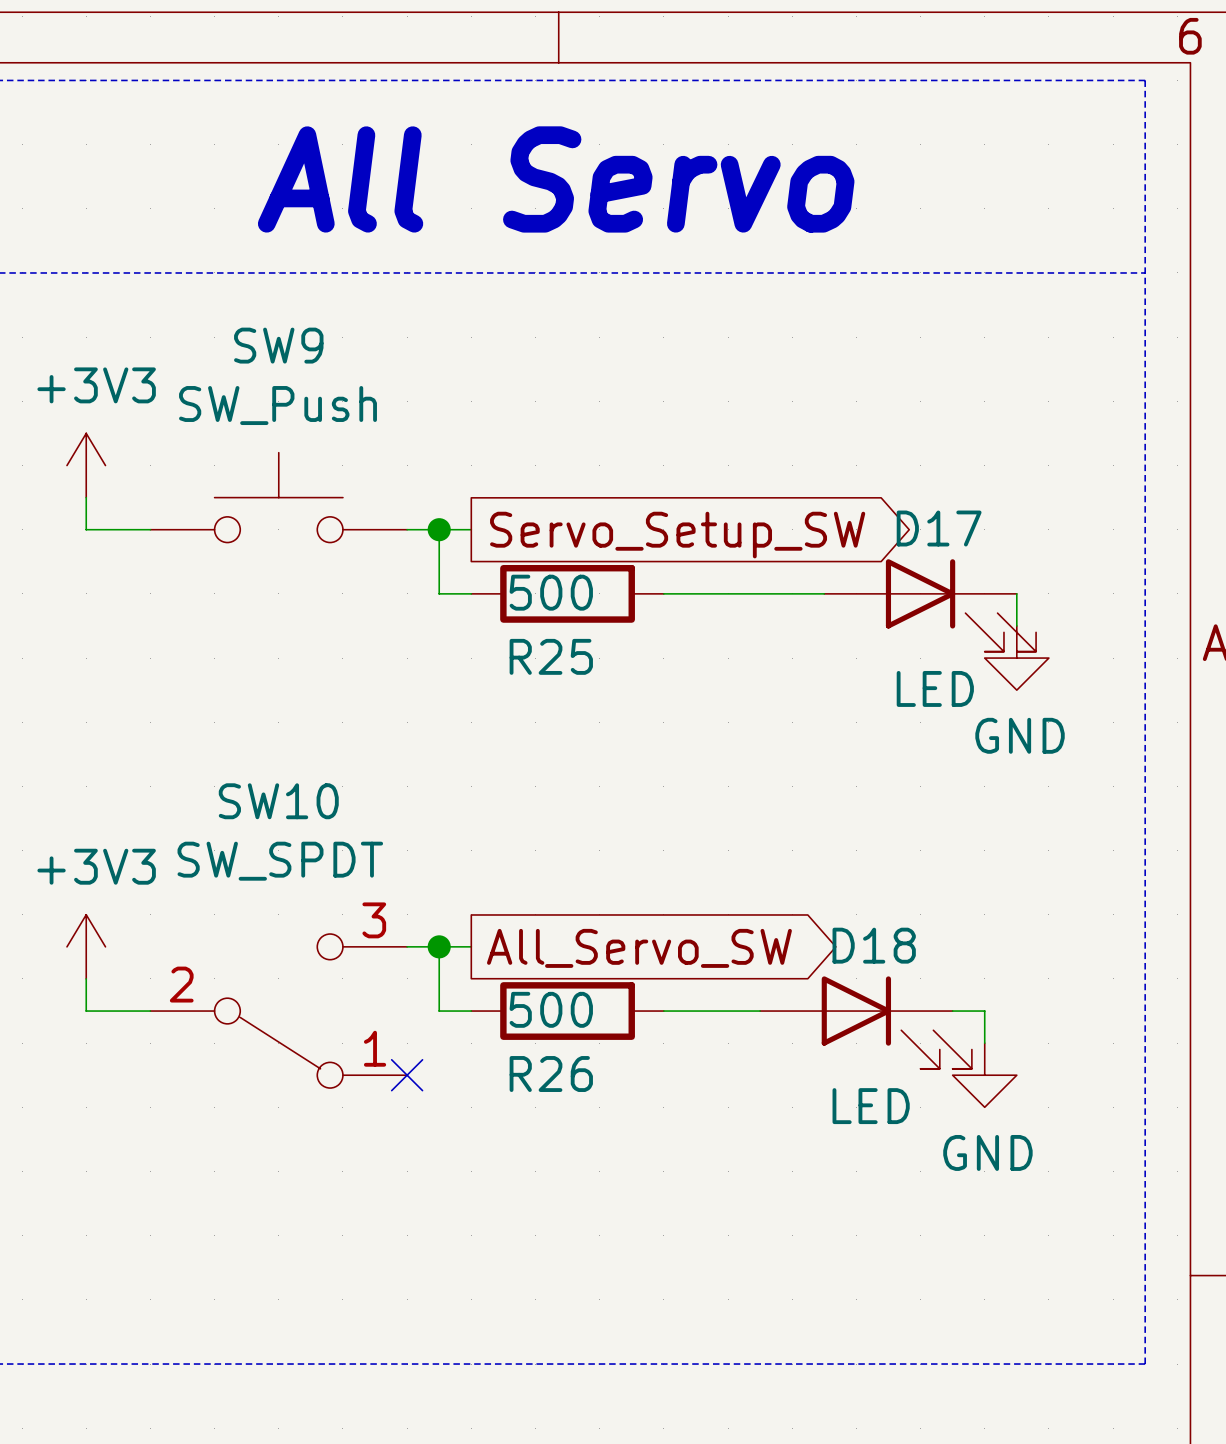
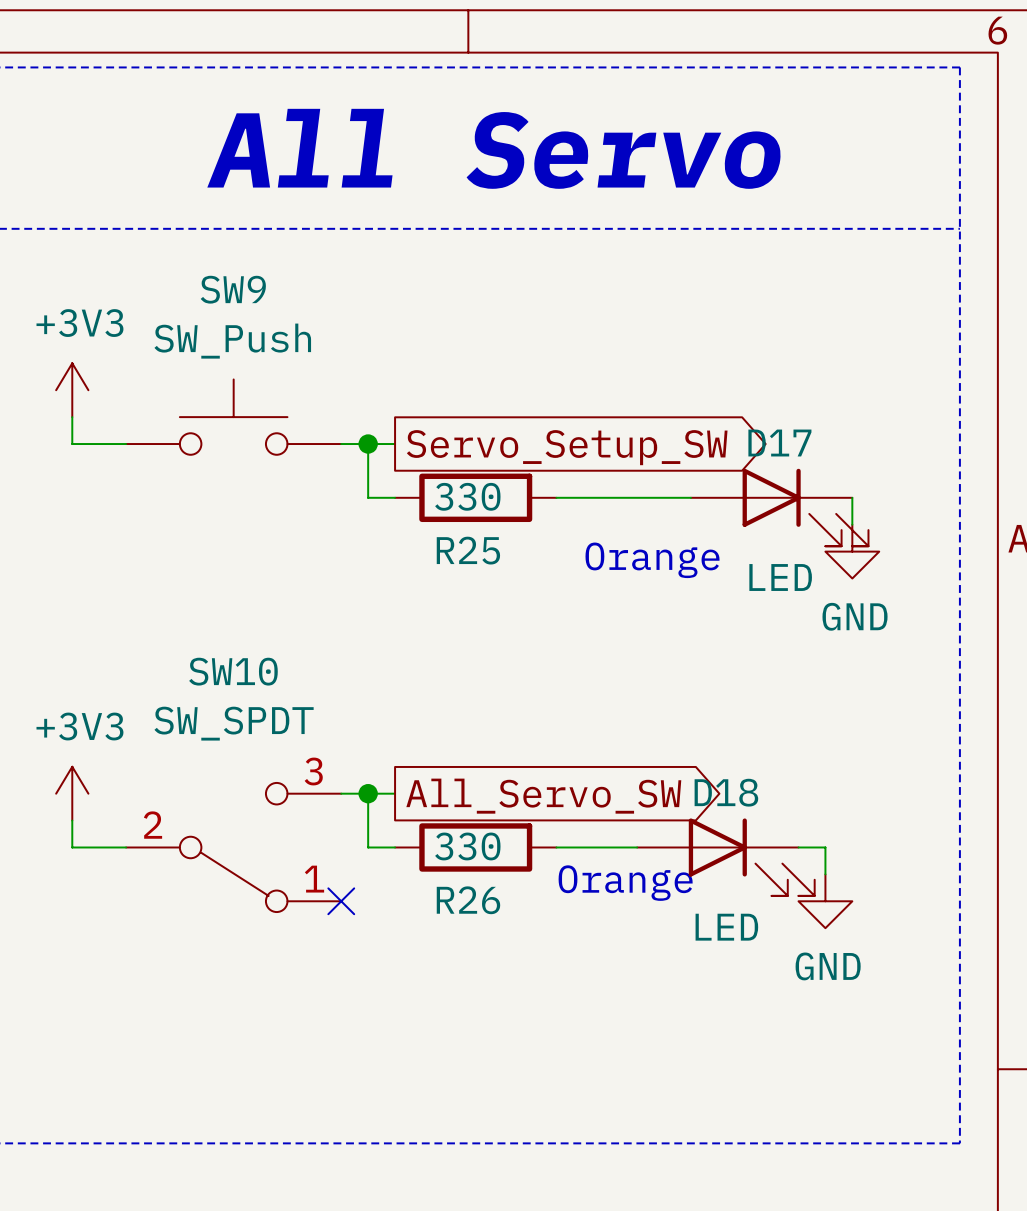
R25 value: 500 (551, 592) -> 330 (467, 496)
text: none -> Orange (652, 560)
R26 value: 500 (551, 1009) -> 330 (467, 846)
text: none -> Orange (625, 883)

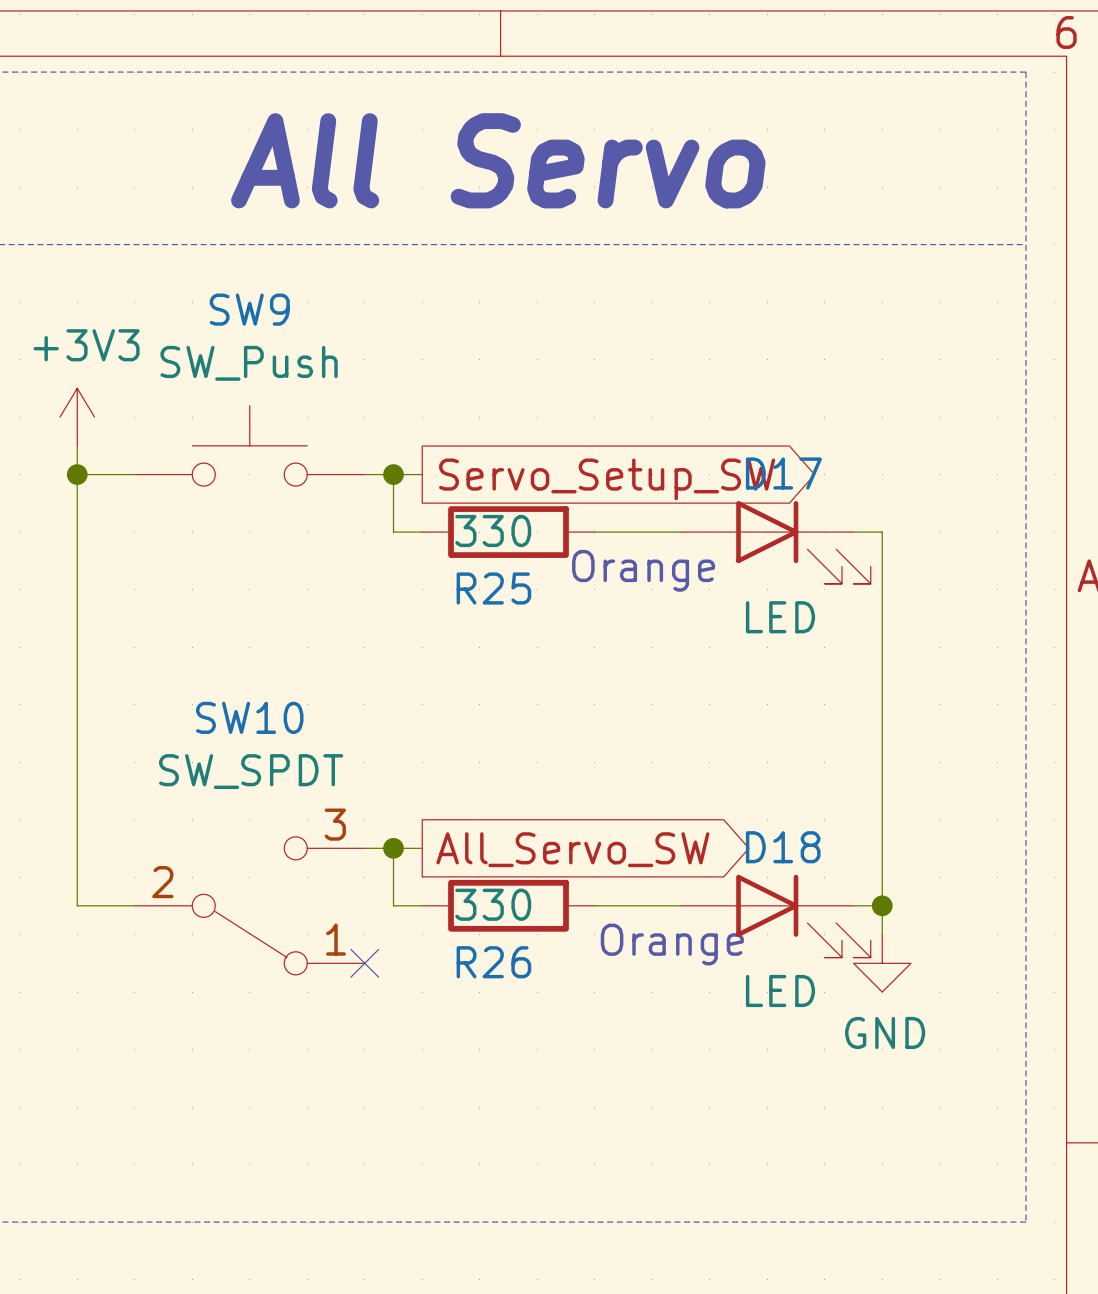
wire: none -> (77, 474) (77, 877)
junction: none -> (77, 474)
wire: none -> (853, 532) (882, 532) (882, 905)
wire: (852, 497) (852, 524) -> none
D17 position: (779, 507) -> (775, 542)
power symbol: GND (852, 551) -> none
text position: Orange (652, 560) -> Orange (643, 570)
power symbol: +3V3 (72, 793) -> none
junction: none -> (882, 905)

